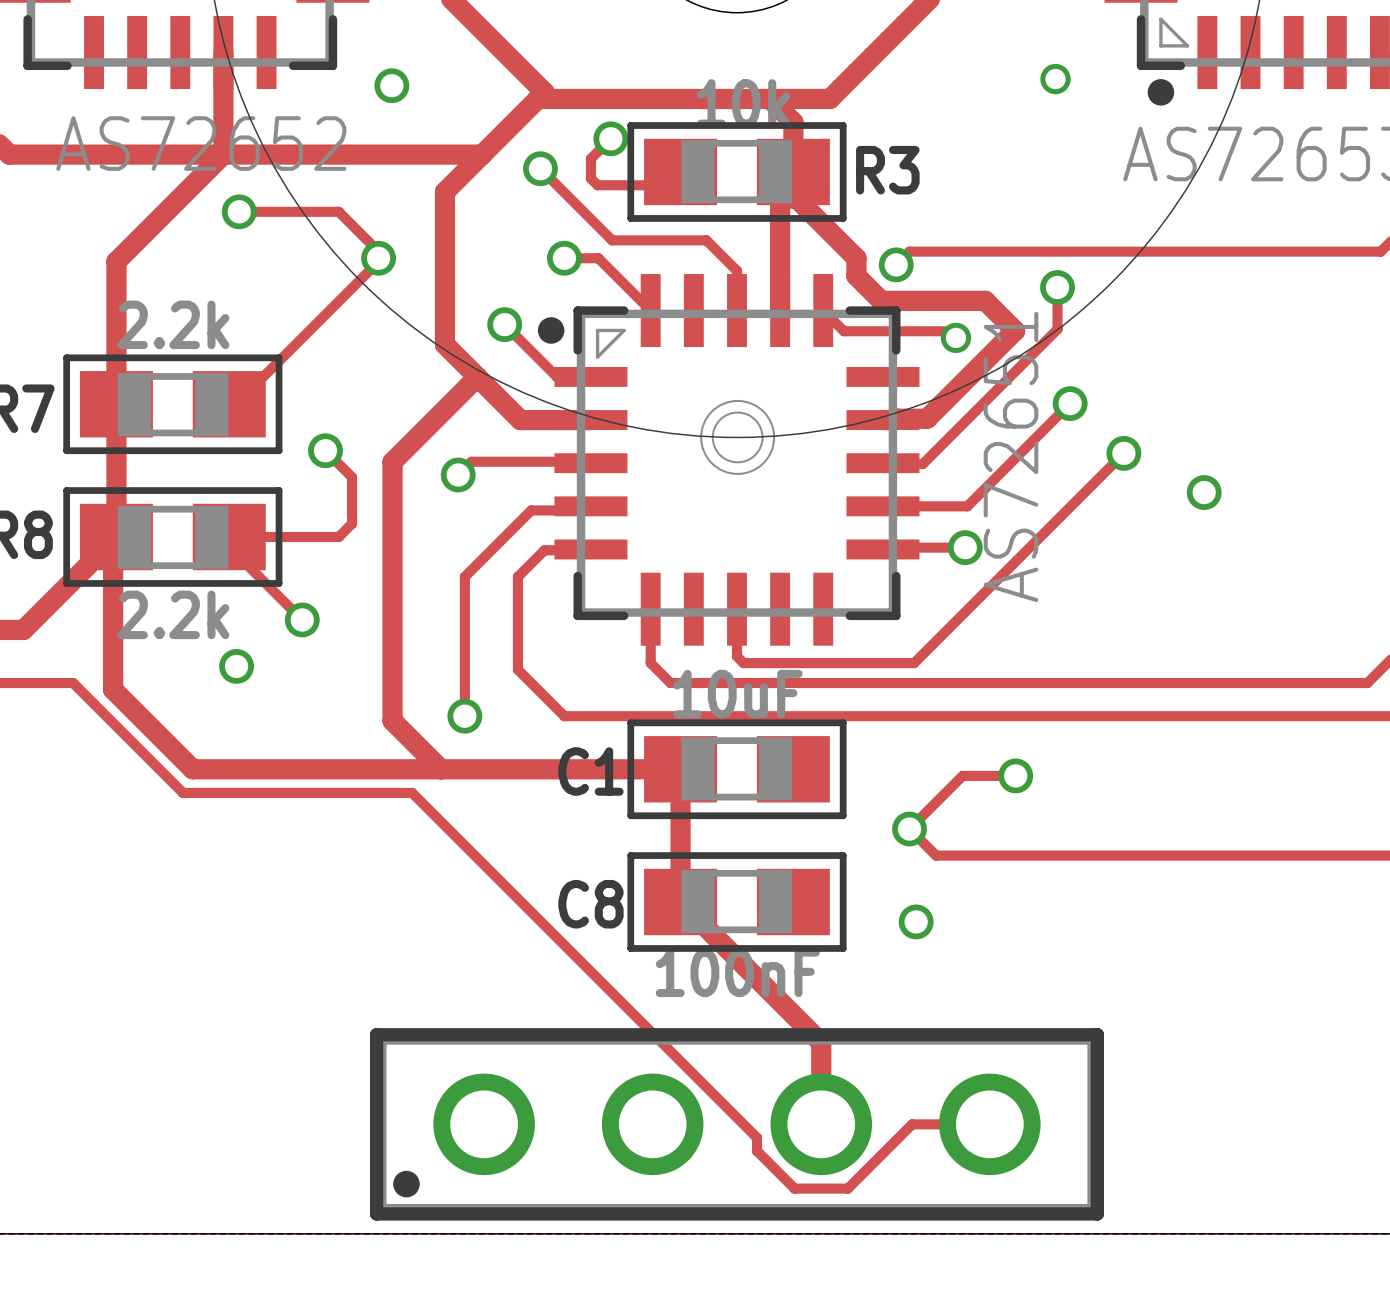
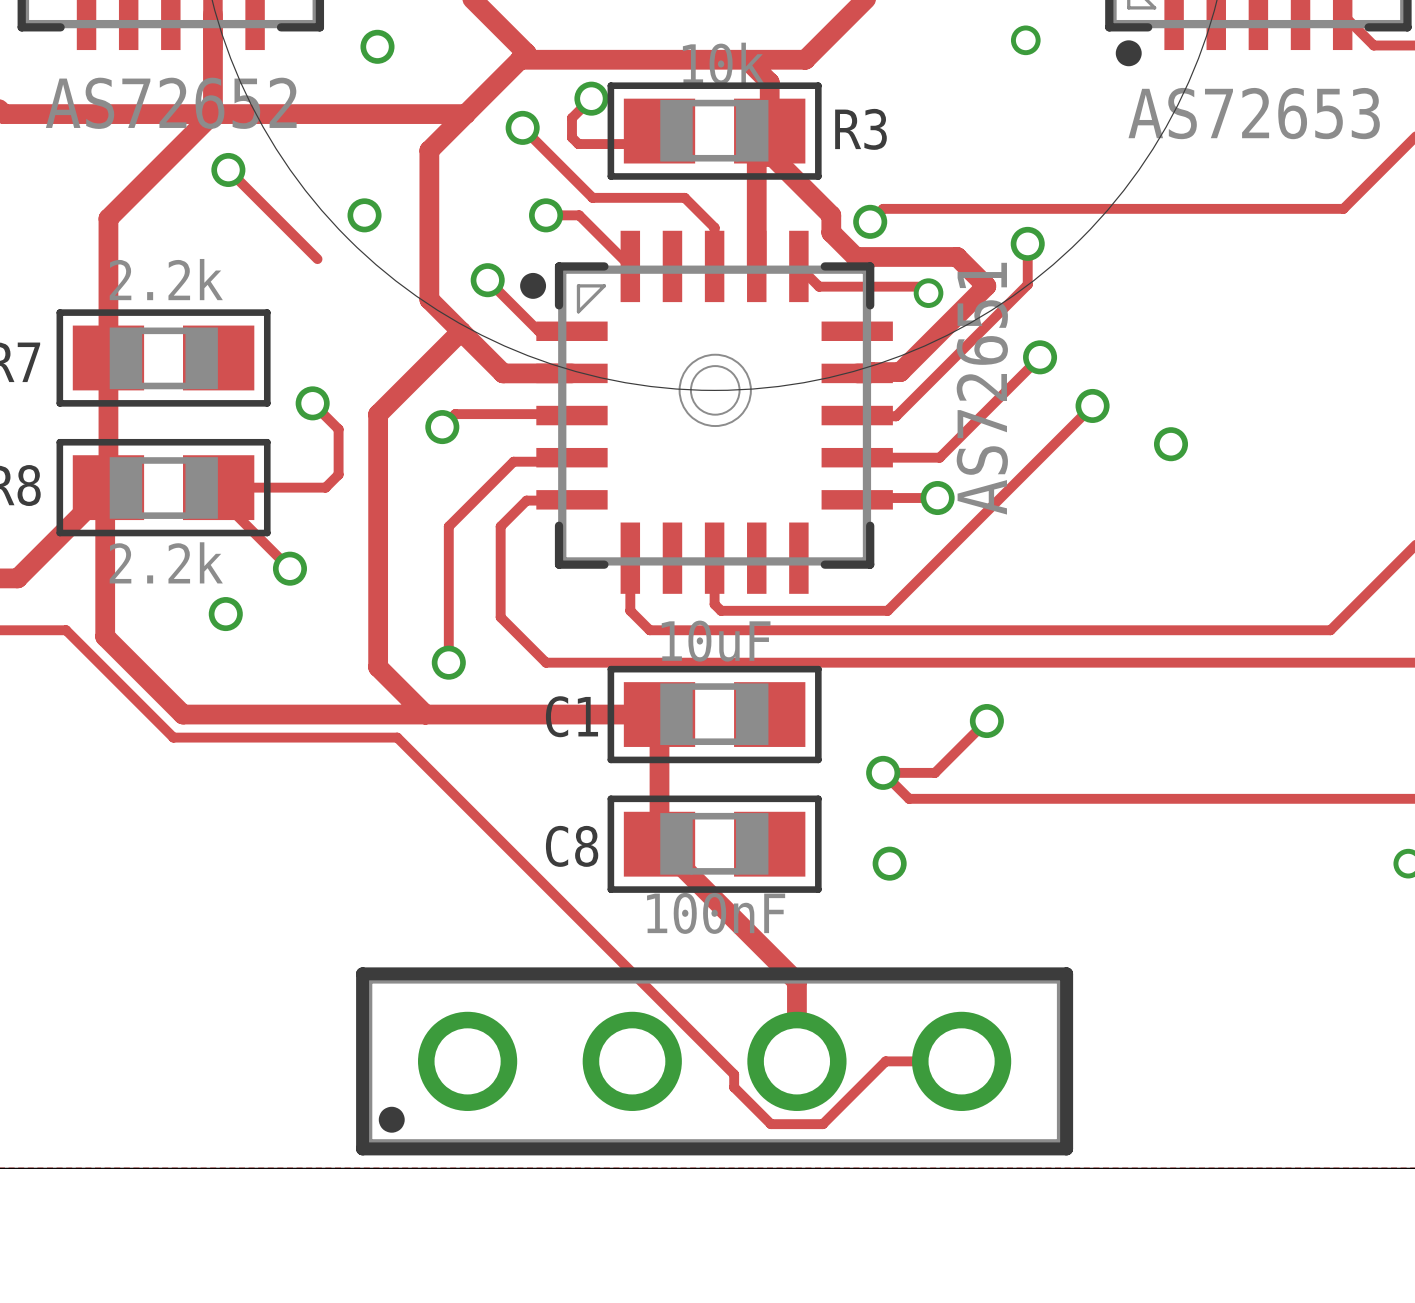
track: (239, 211) (338, 211) (383, 256) (235, 404) (229, 404) -> (228, 169) (317, 259)
track: (1015, 775) (962, 775) (909, 829) -> (986, 721) (935, 772) (883, 772)

